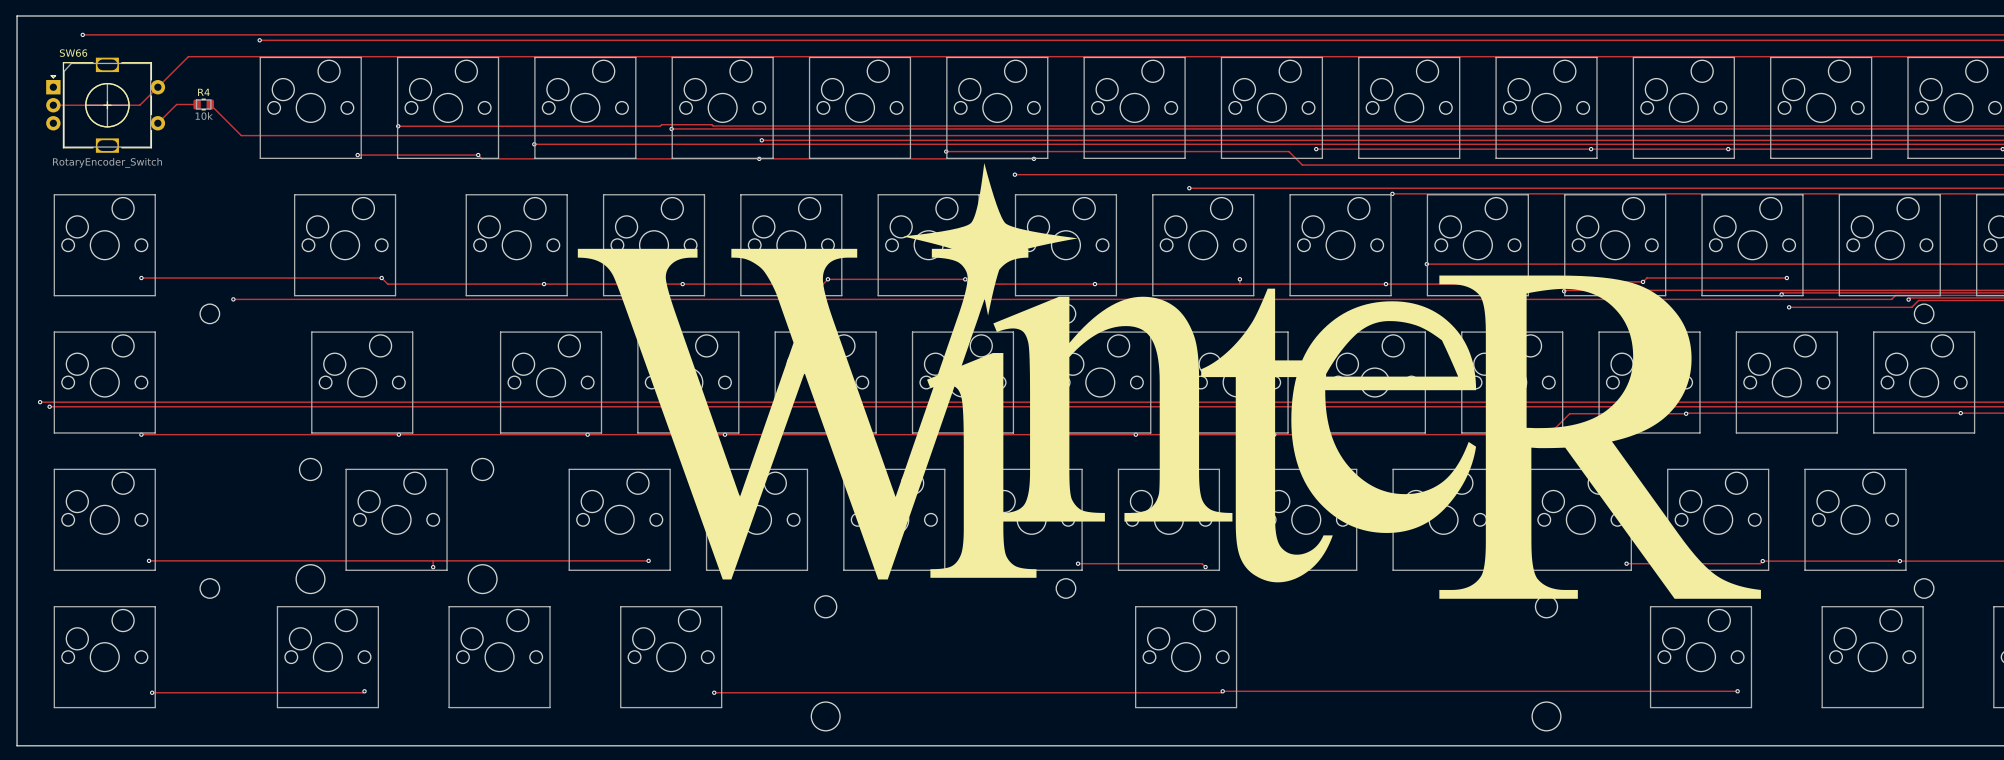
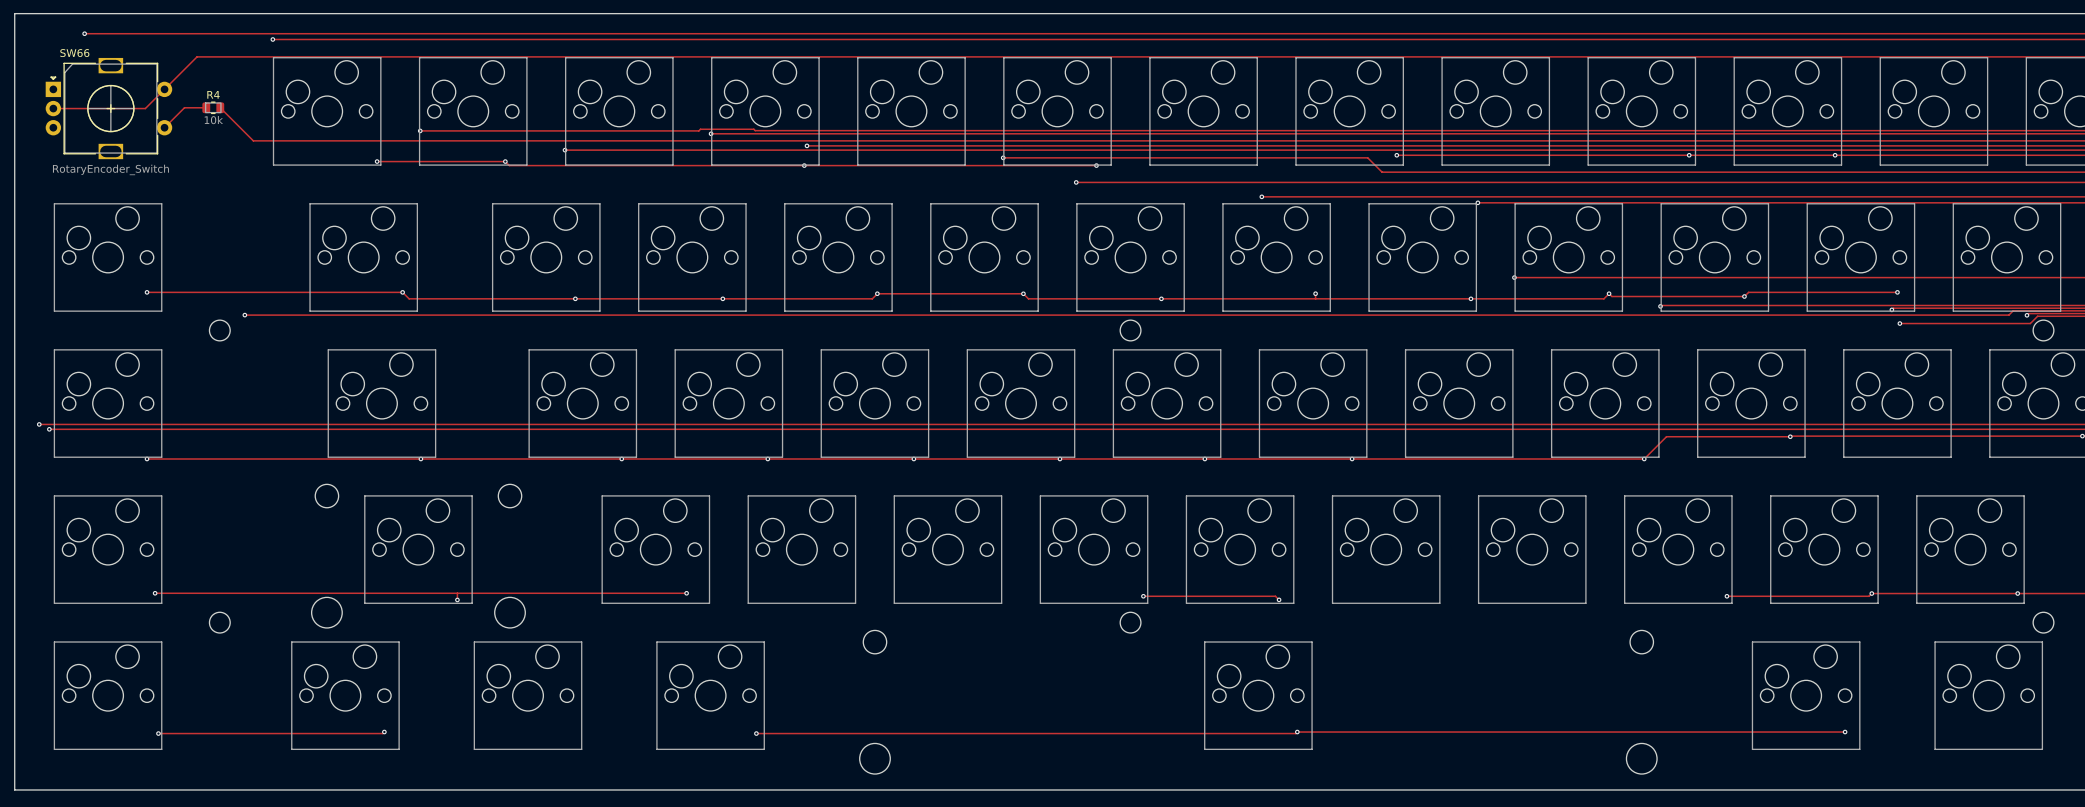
drawing: [577, 163, 1761, 599] -> none

